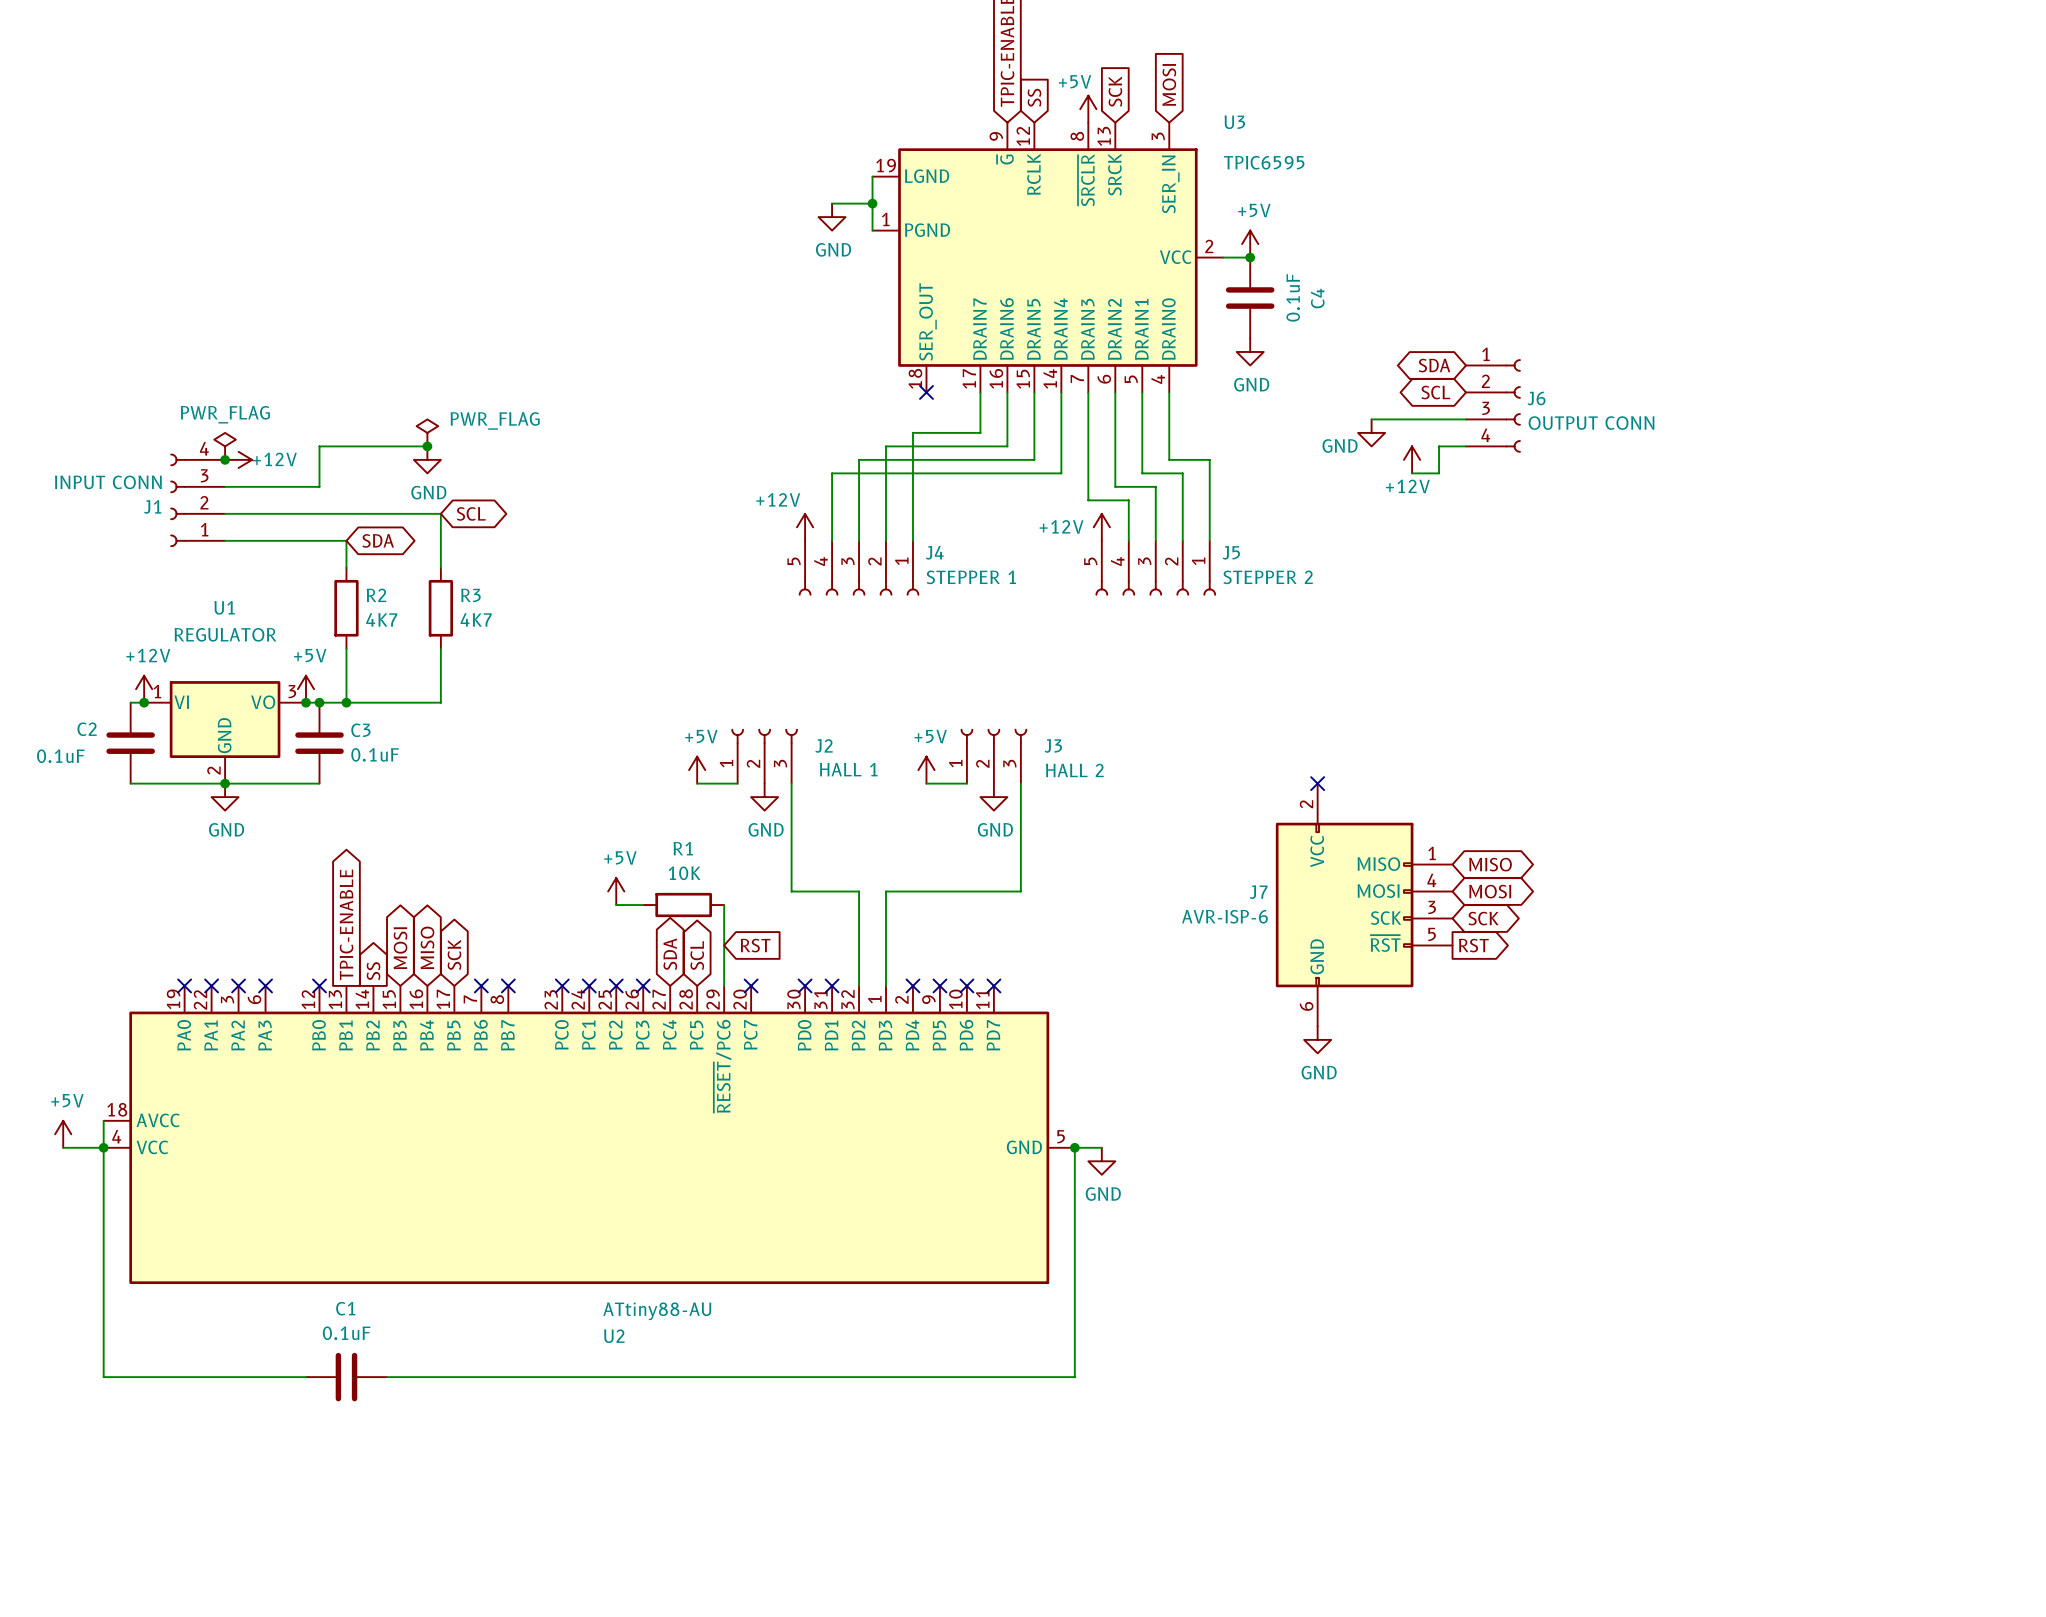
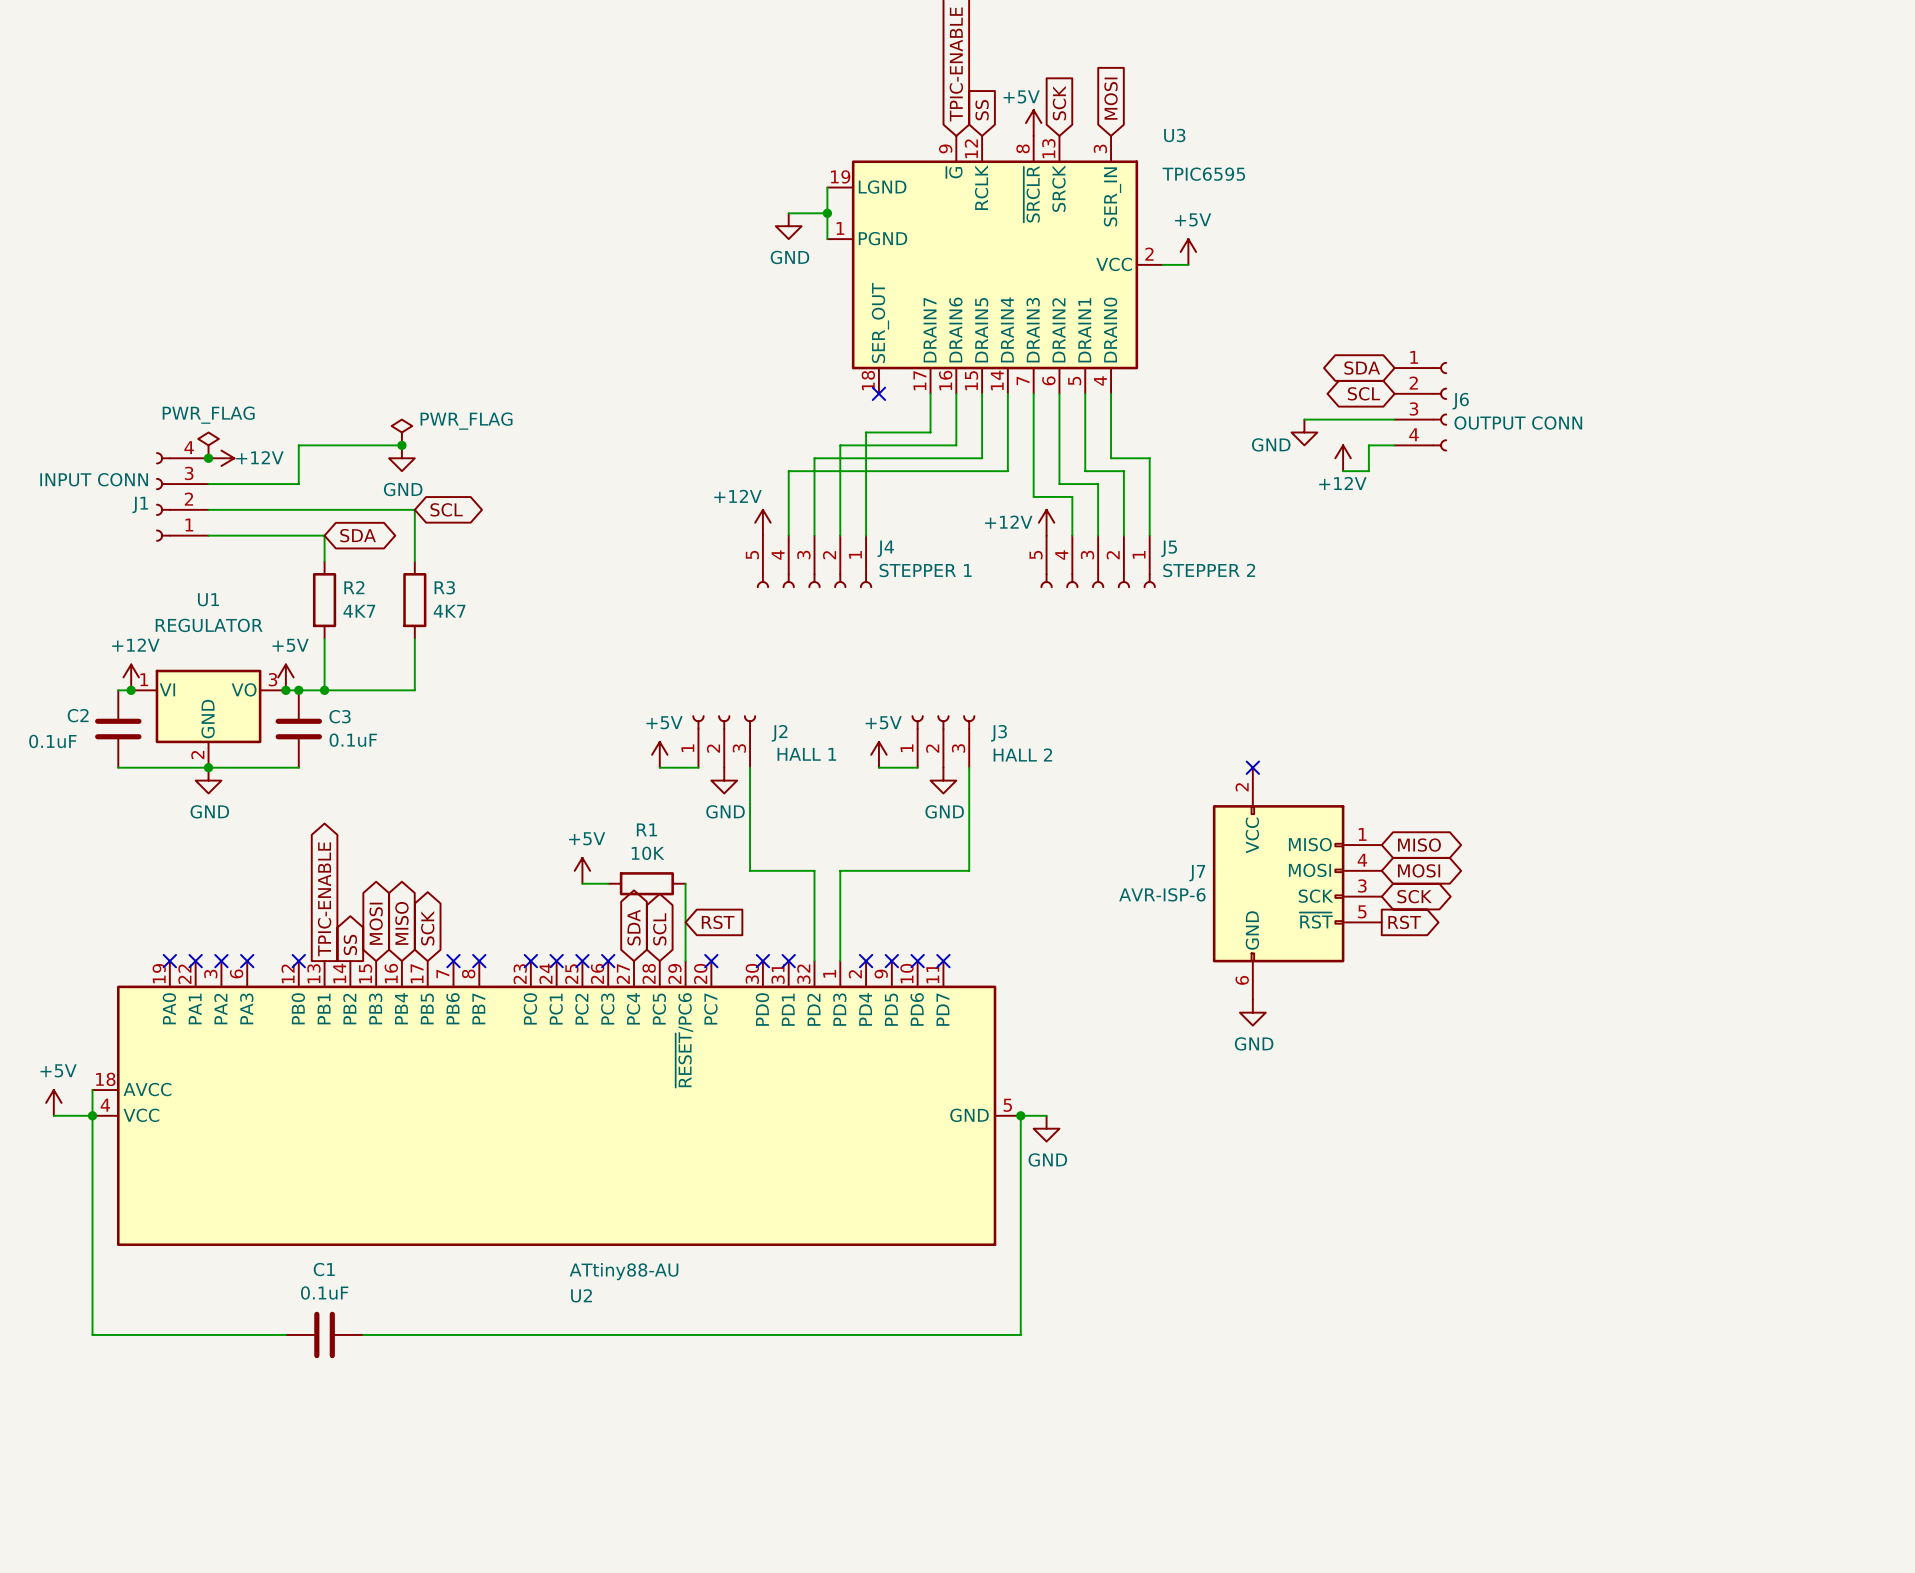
junction: (1250, 257) -> none
C4: 0.1uF (1250, 298) -> none
power symbol: GND (1250, 351) -> none

